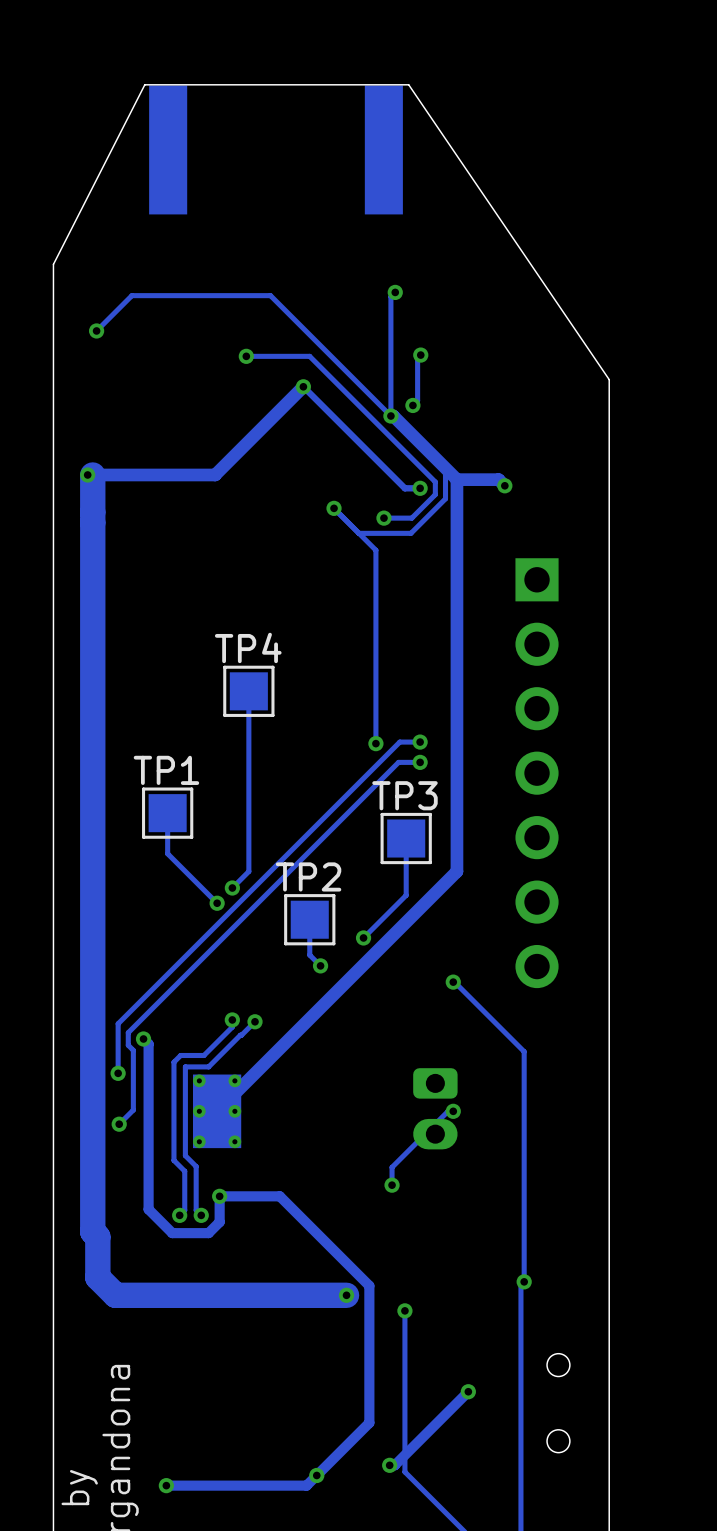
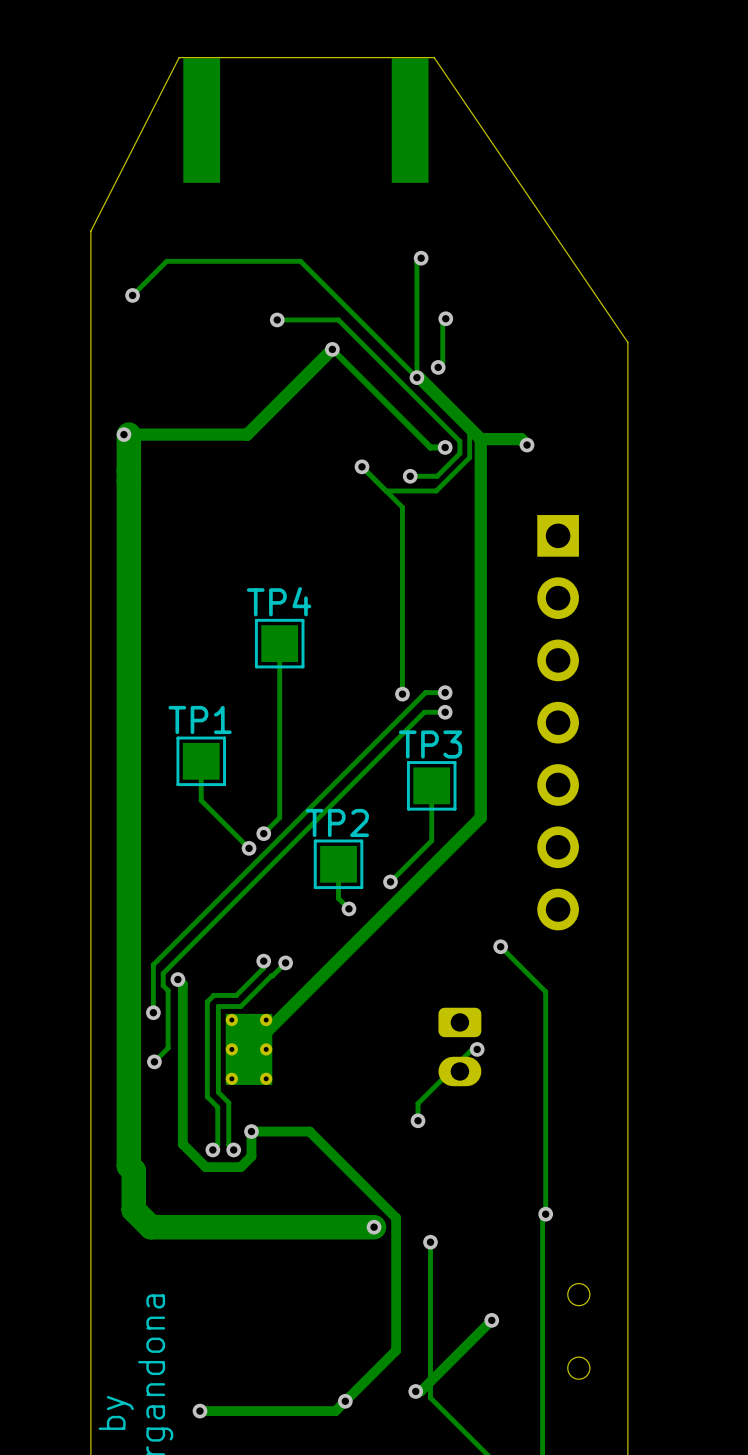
via position: (453, 982) -> (500, 946)
track: (455, 983) (477, 1005) -> none

